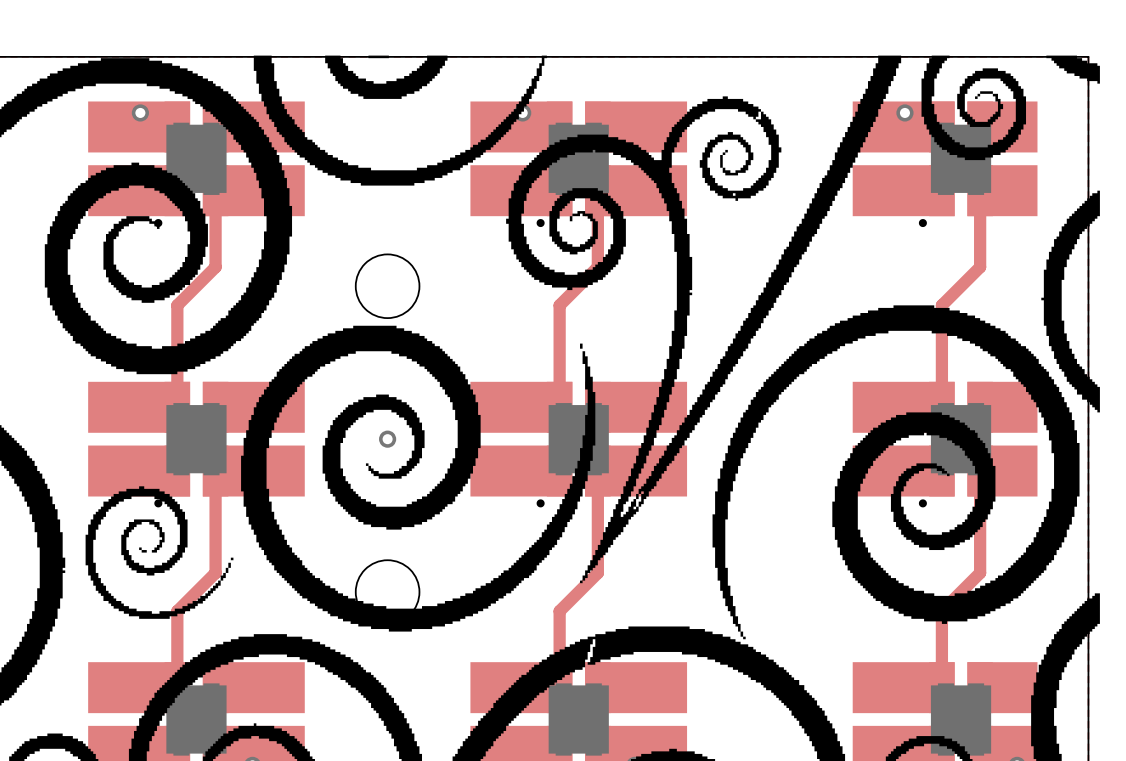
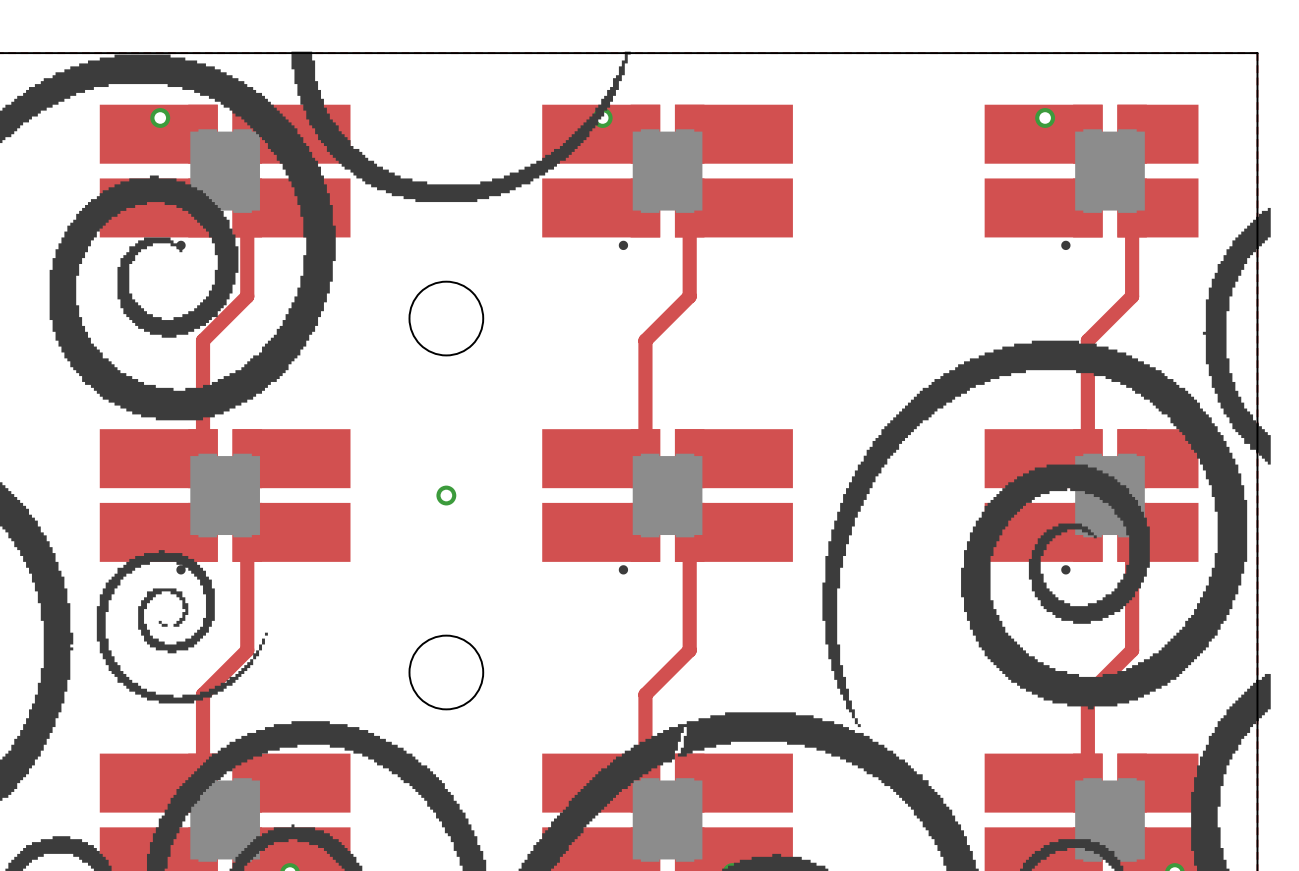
drawing: [325, 55, 448, 99] -> none
drawing: [506, 55, 902, 584] -> none
drawing: [921, 55, 1027, 161] -> none
drawing: [1046, 55, 1100, 84] -> none
drawing: [241, 325, 596, 632] -> none

